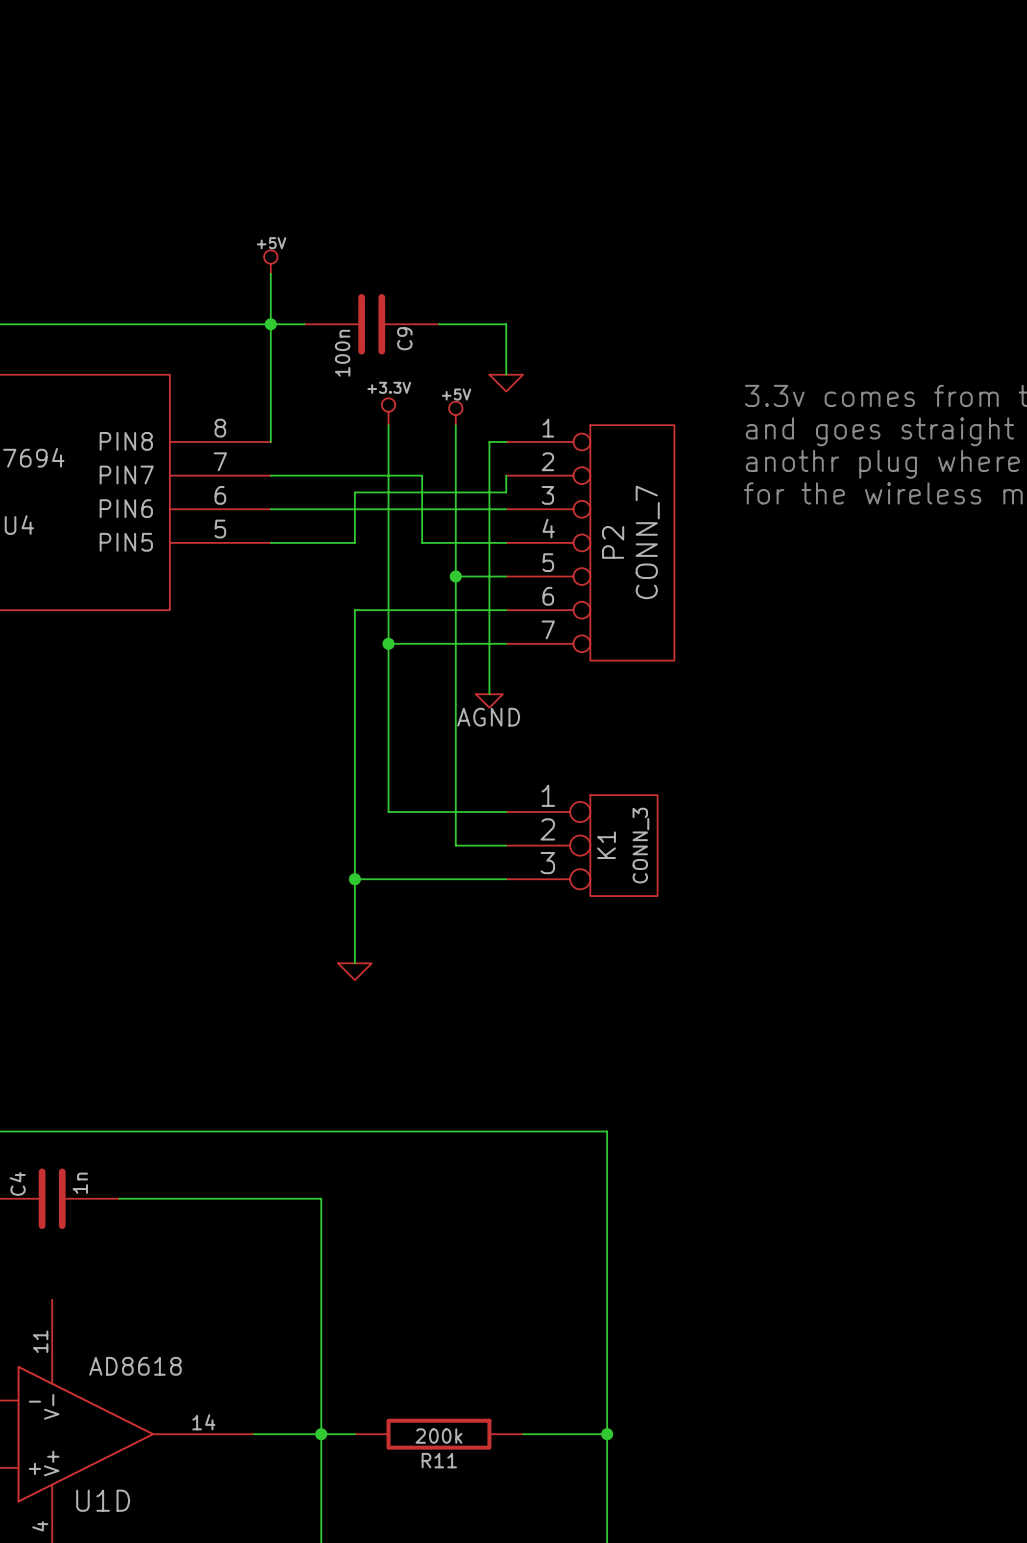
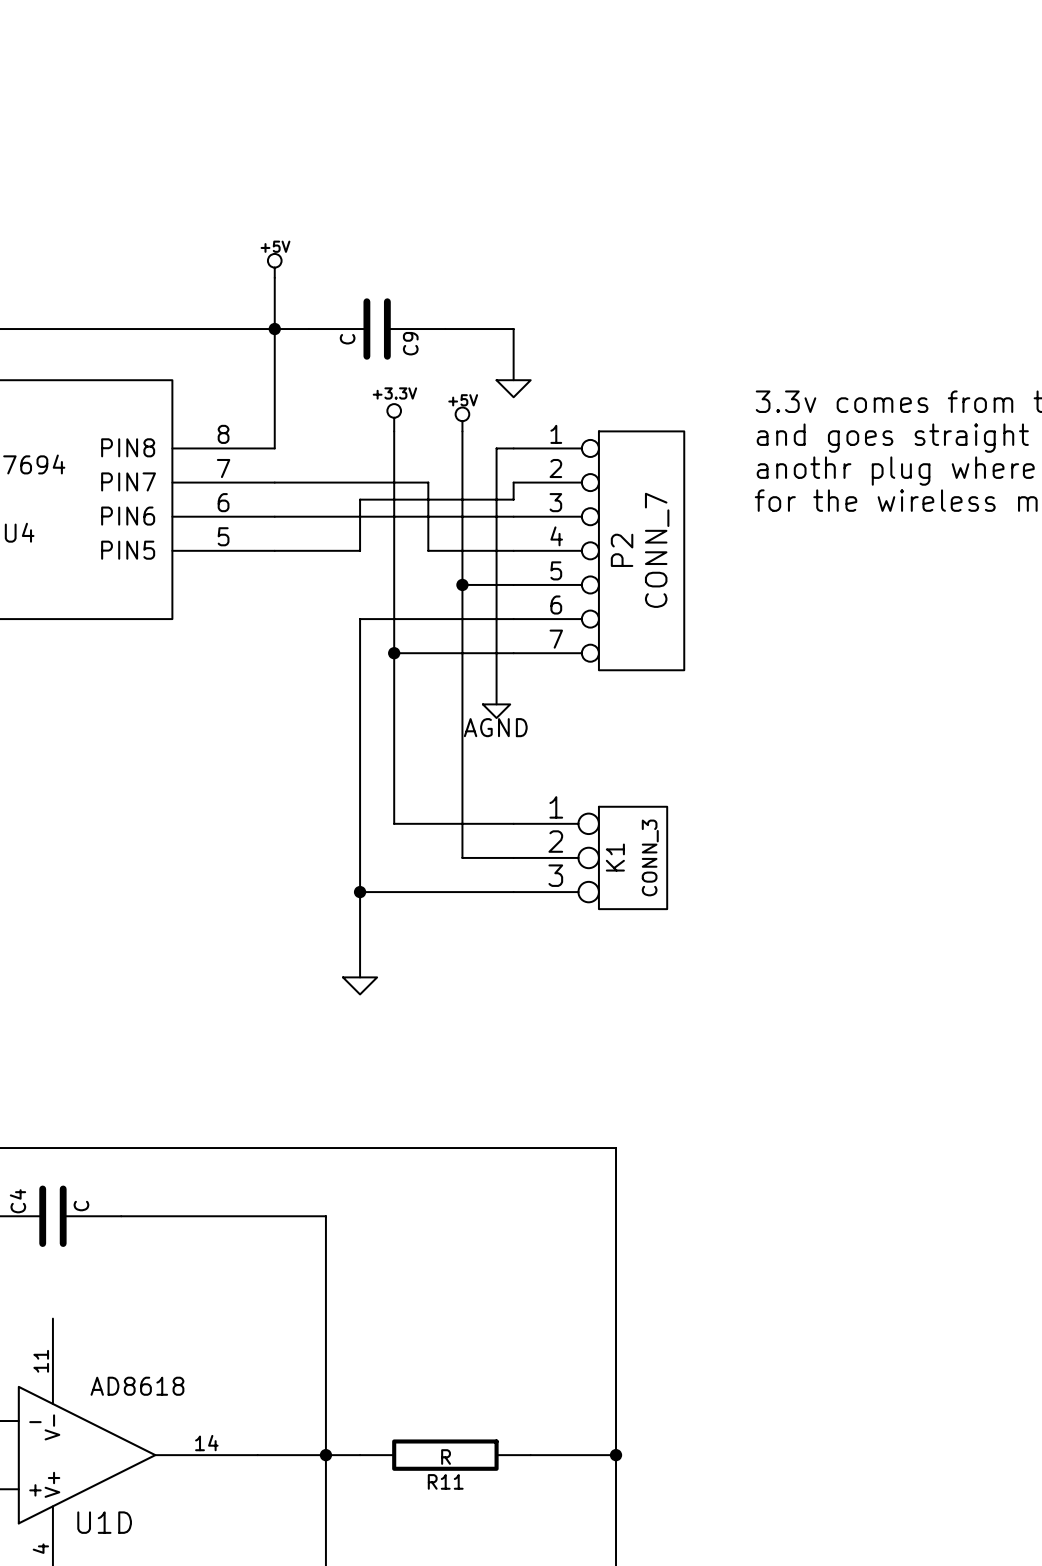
C9 value: 100n (342, 353) -> C (347, 339)
C4 value: 1n (80, 1183) -> C (81, 1206)
R11 value: 200k (438, 1436) -> R (446, 1457)

